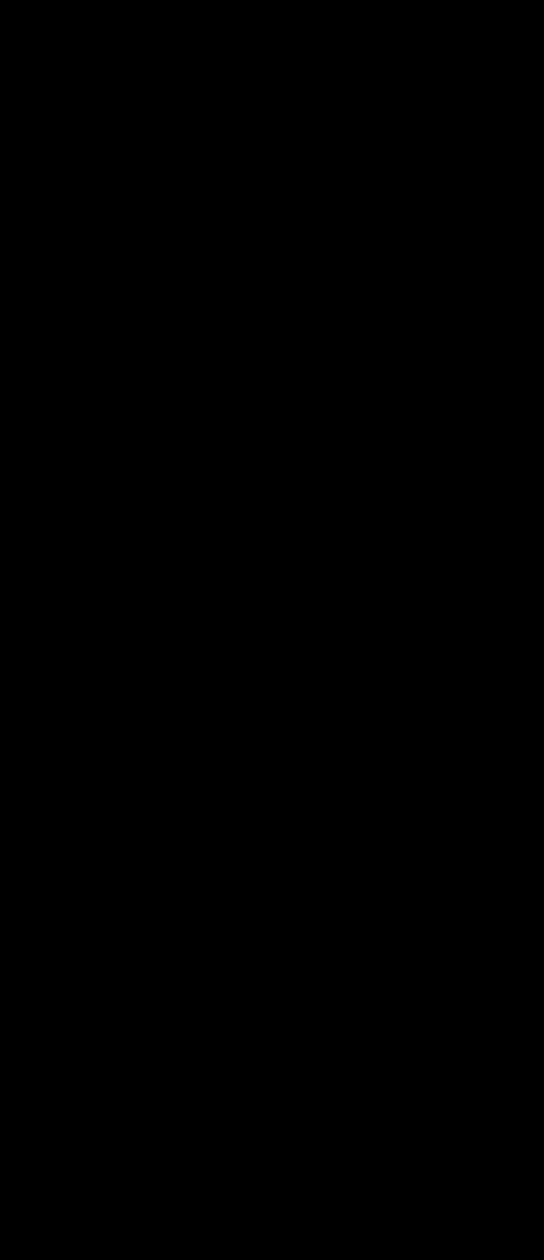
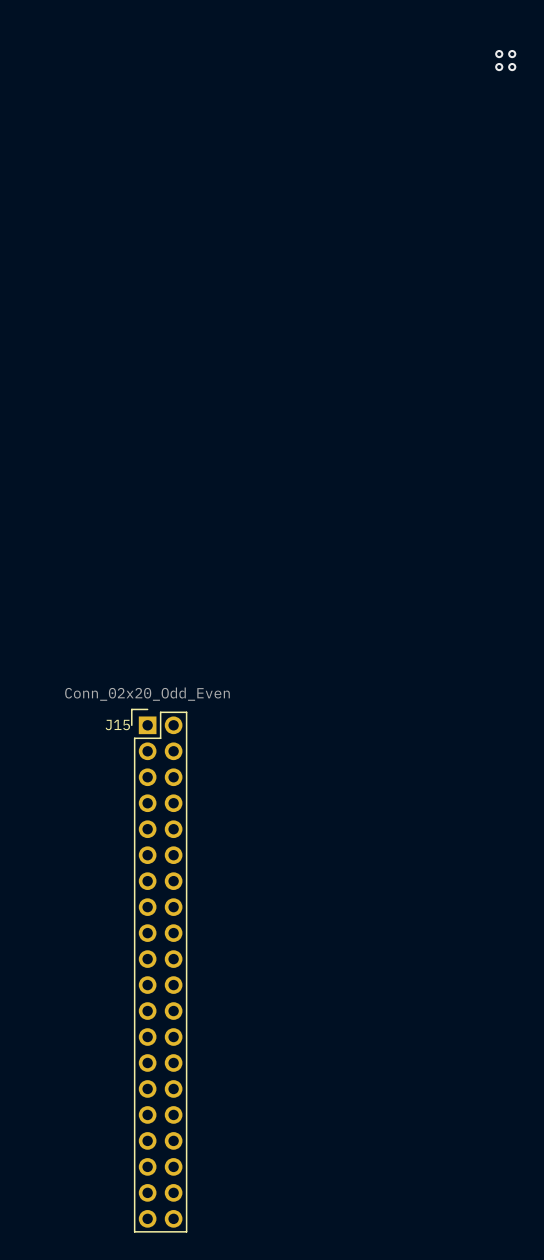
via: none -> (499, 54)
via: none -> (512, 54)
via: none -> (499, 67)
via: none -> (512, 67)
J15: none -> Conn_02x20_Odd_Even (159, 970)

